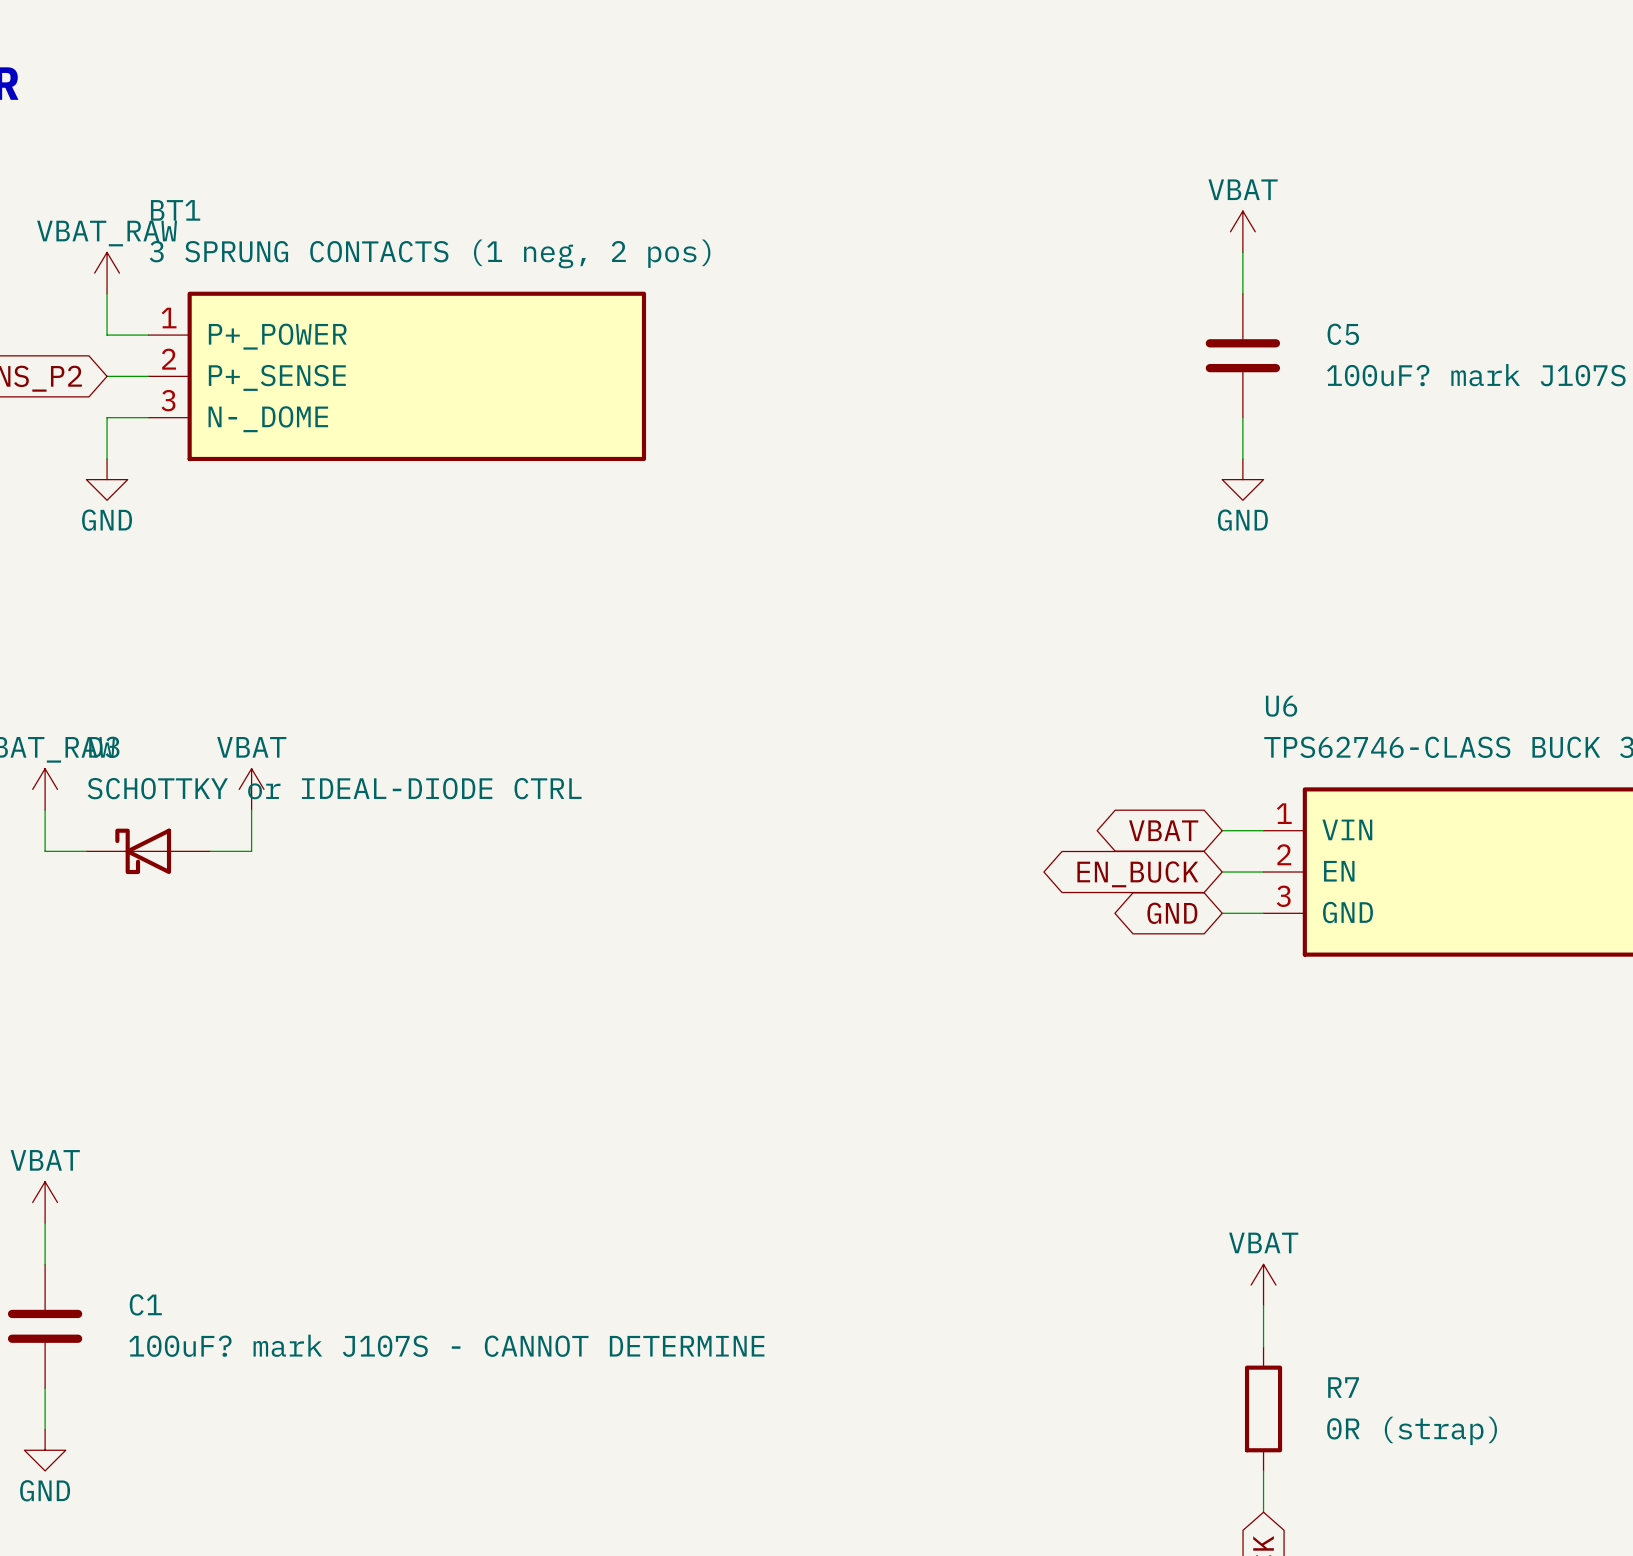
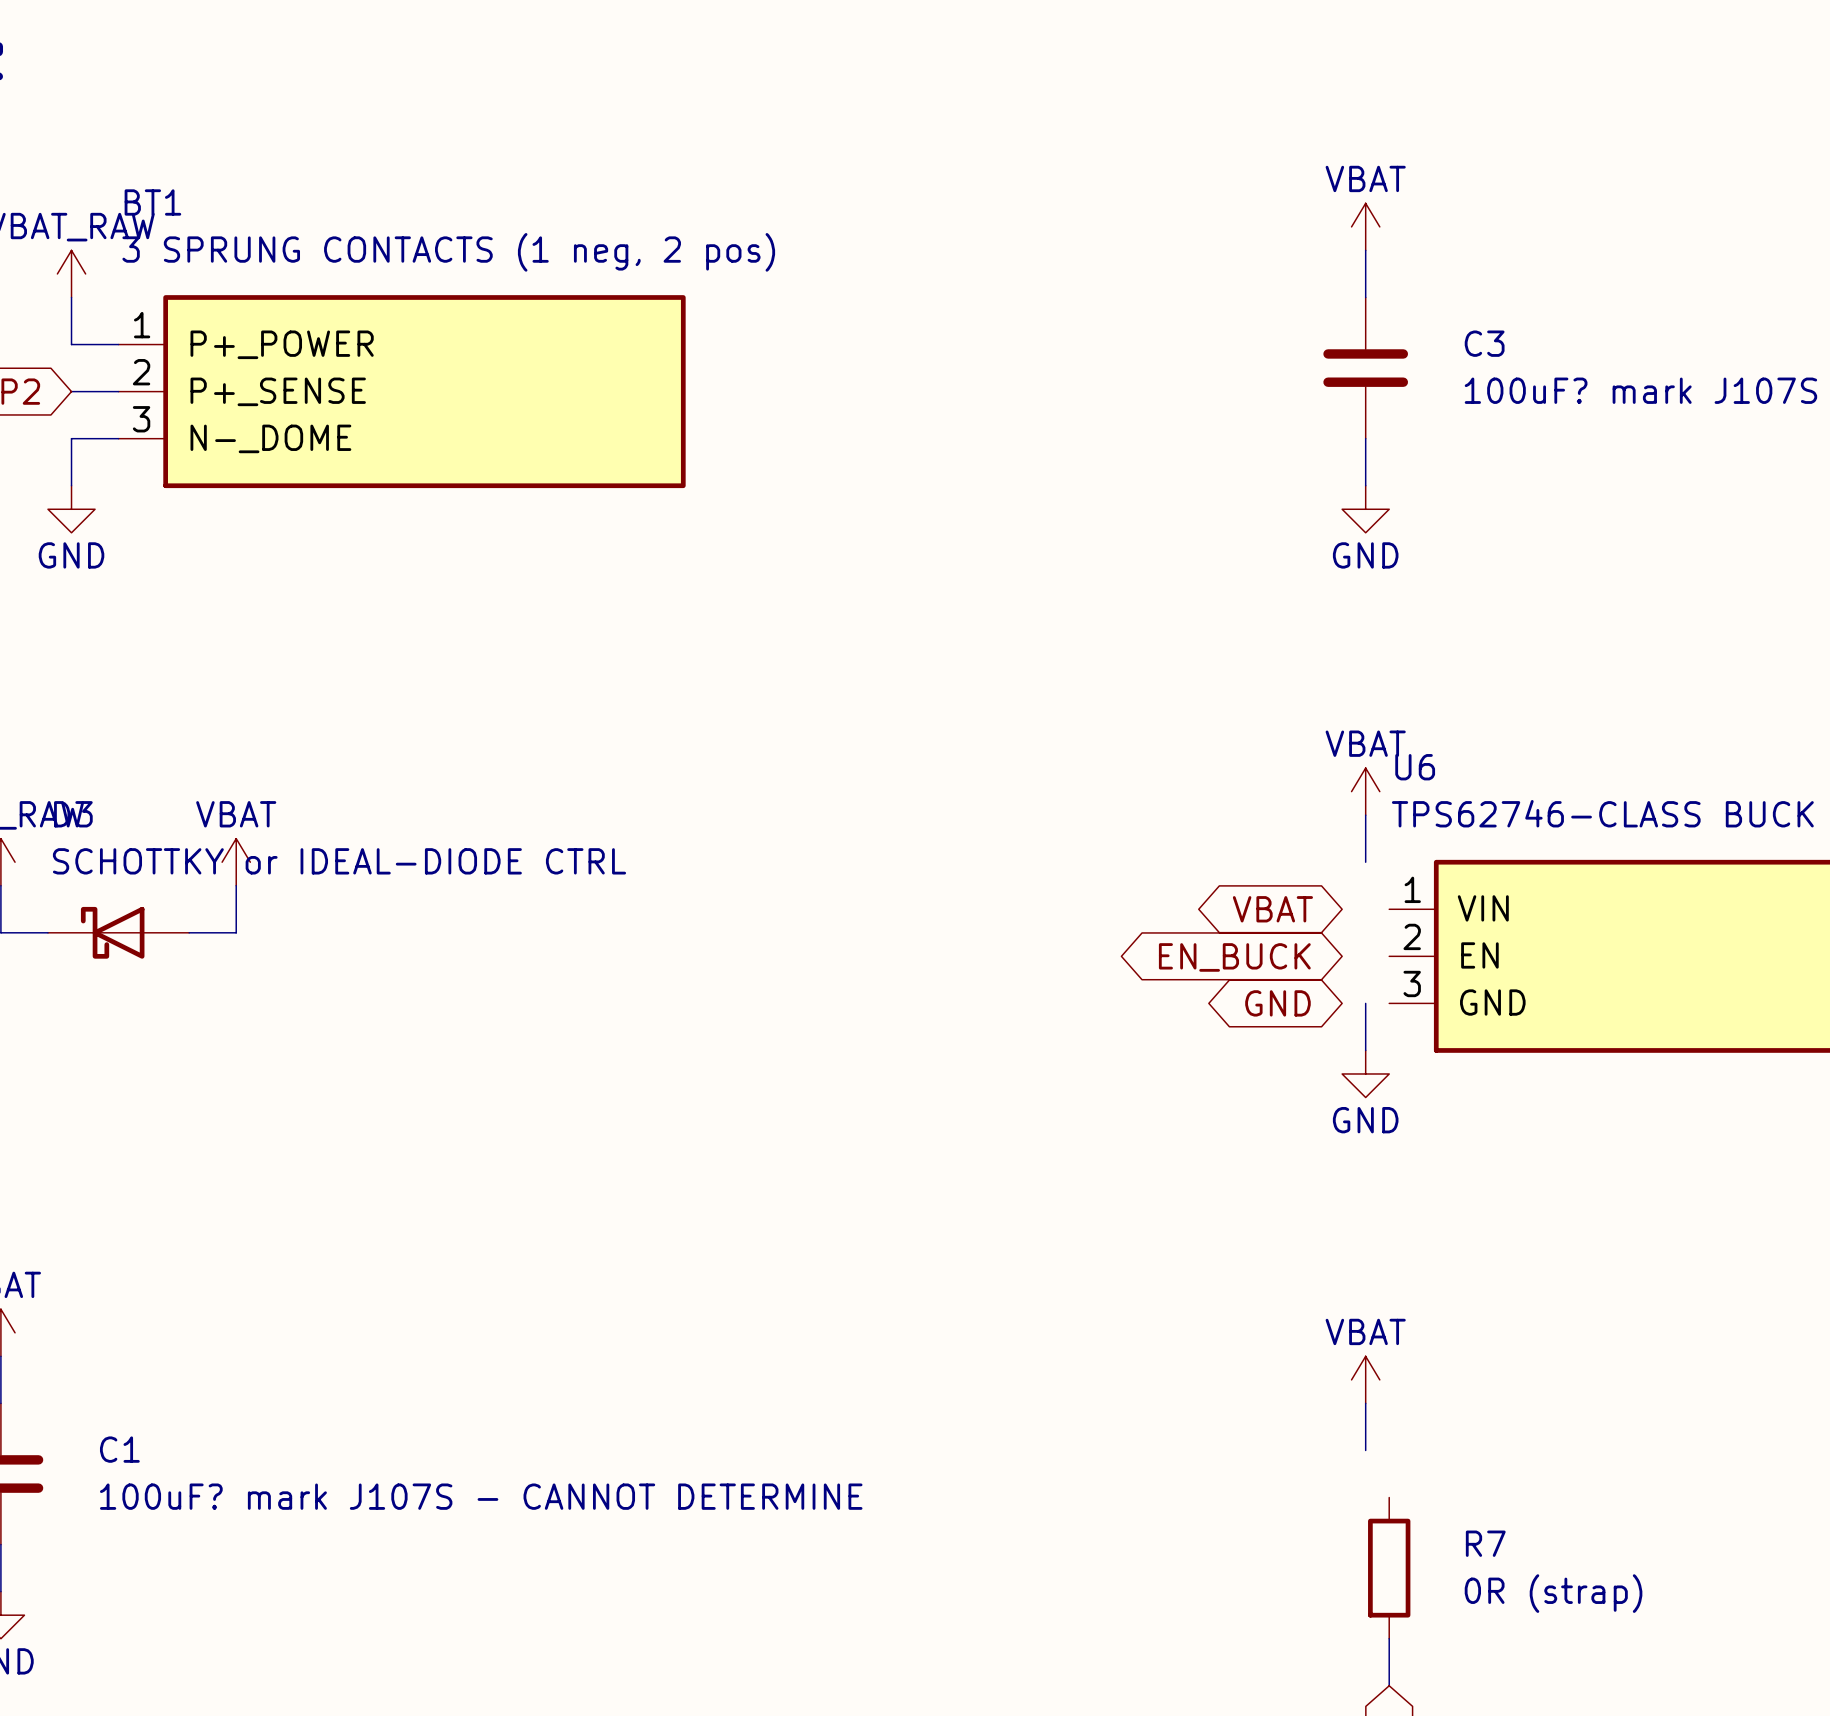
C5 name: C5 (1343, 334) -> C3 (1484, 343)
power symbol: none -> VBAT (1365, 791)
wire: none -> (1365, 815) (1365, 862)
wire: (1222, 830) (1263, 830) -> none
wire: (1222, 872) (1263, 872) -> none
wire: (1222, 913) (1263, 913) -> none
wire: none -> (1365, 1003) (1365, 1050)
power symbol: none -> GND (1365, 1073)
power symbol position: VBAT (1263, 1285) -> VBAT (1365, 1379)
wire: (1263, 1305) (1263, 1347) -> (1365, 1403) (1365, 1450)

